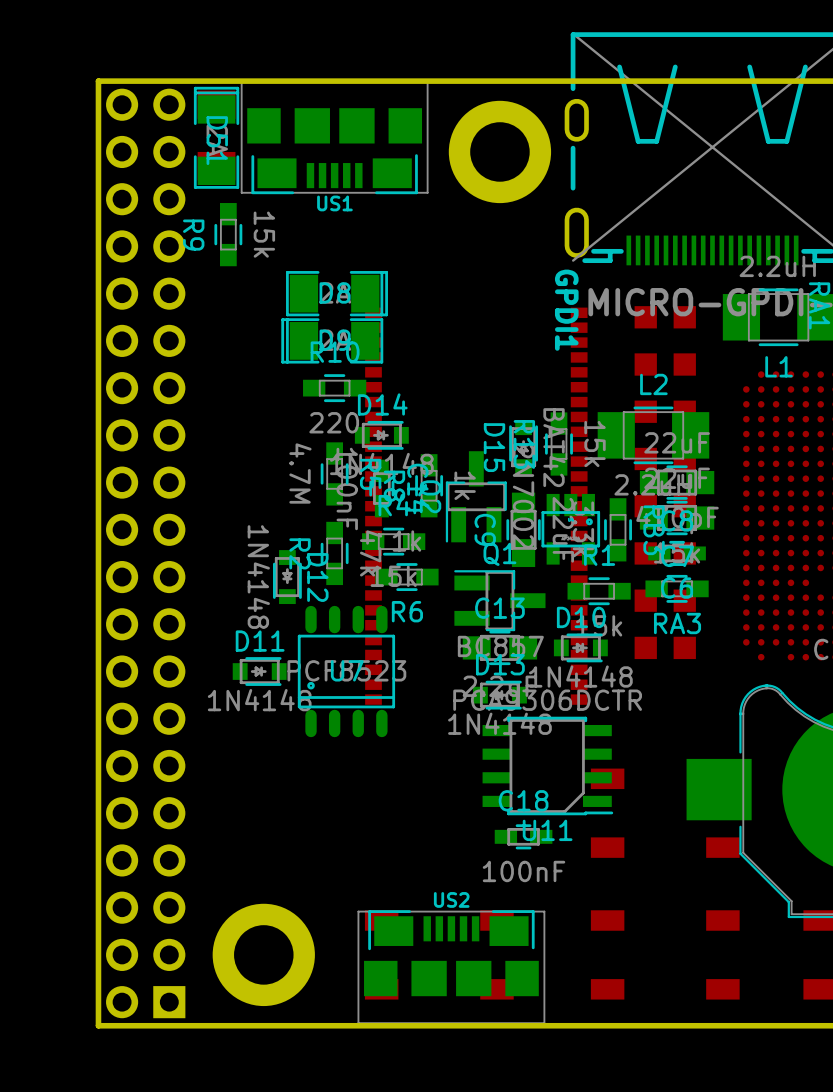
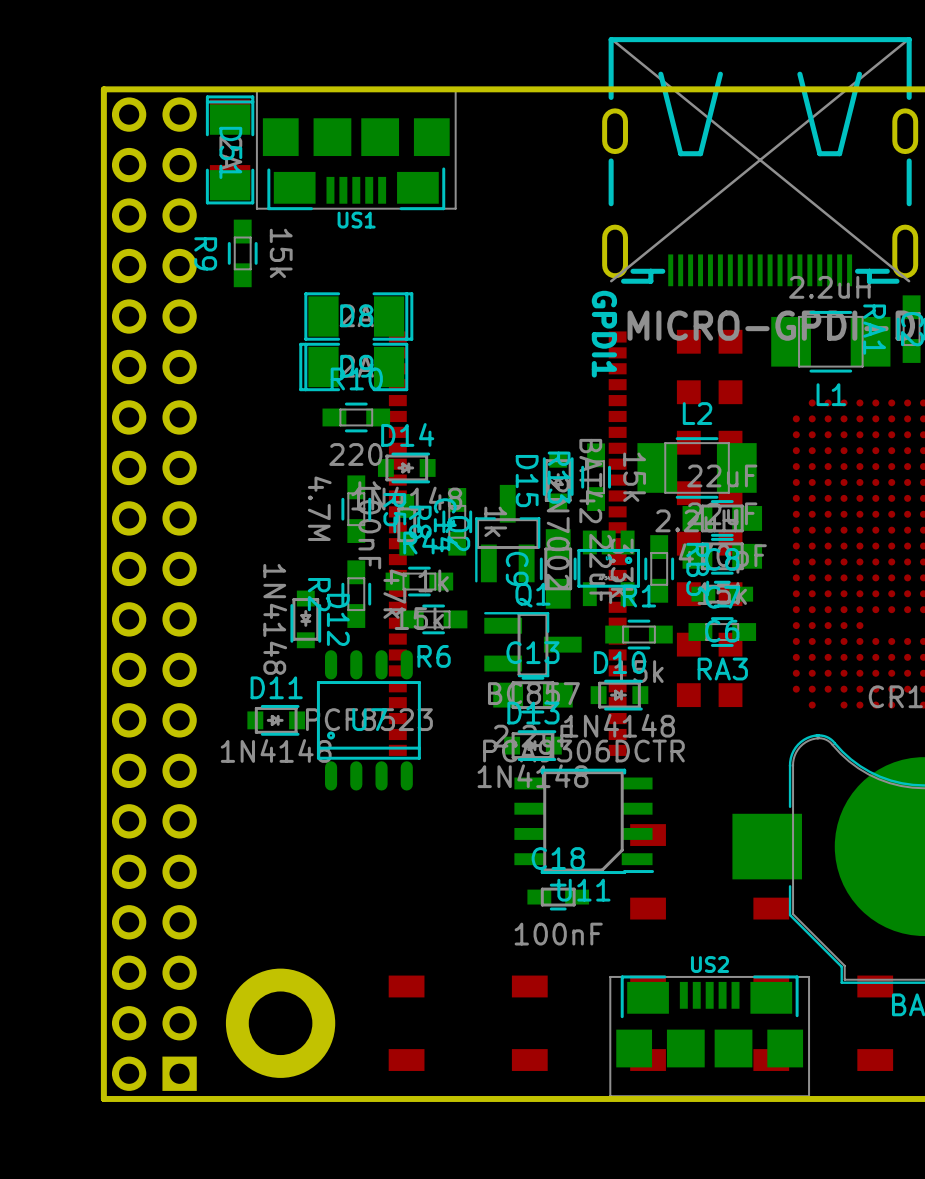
part: (499, 151) -> none
US2 position: (451, 967) -> (709, 1036)

